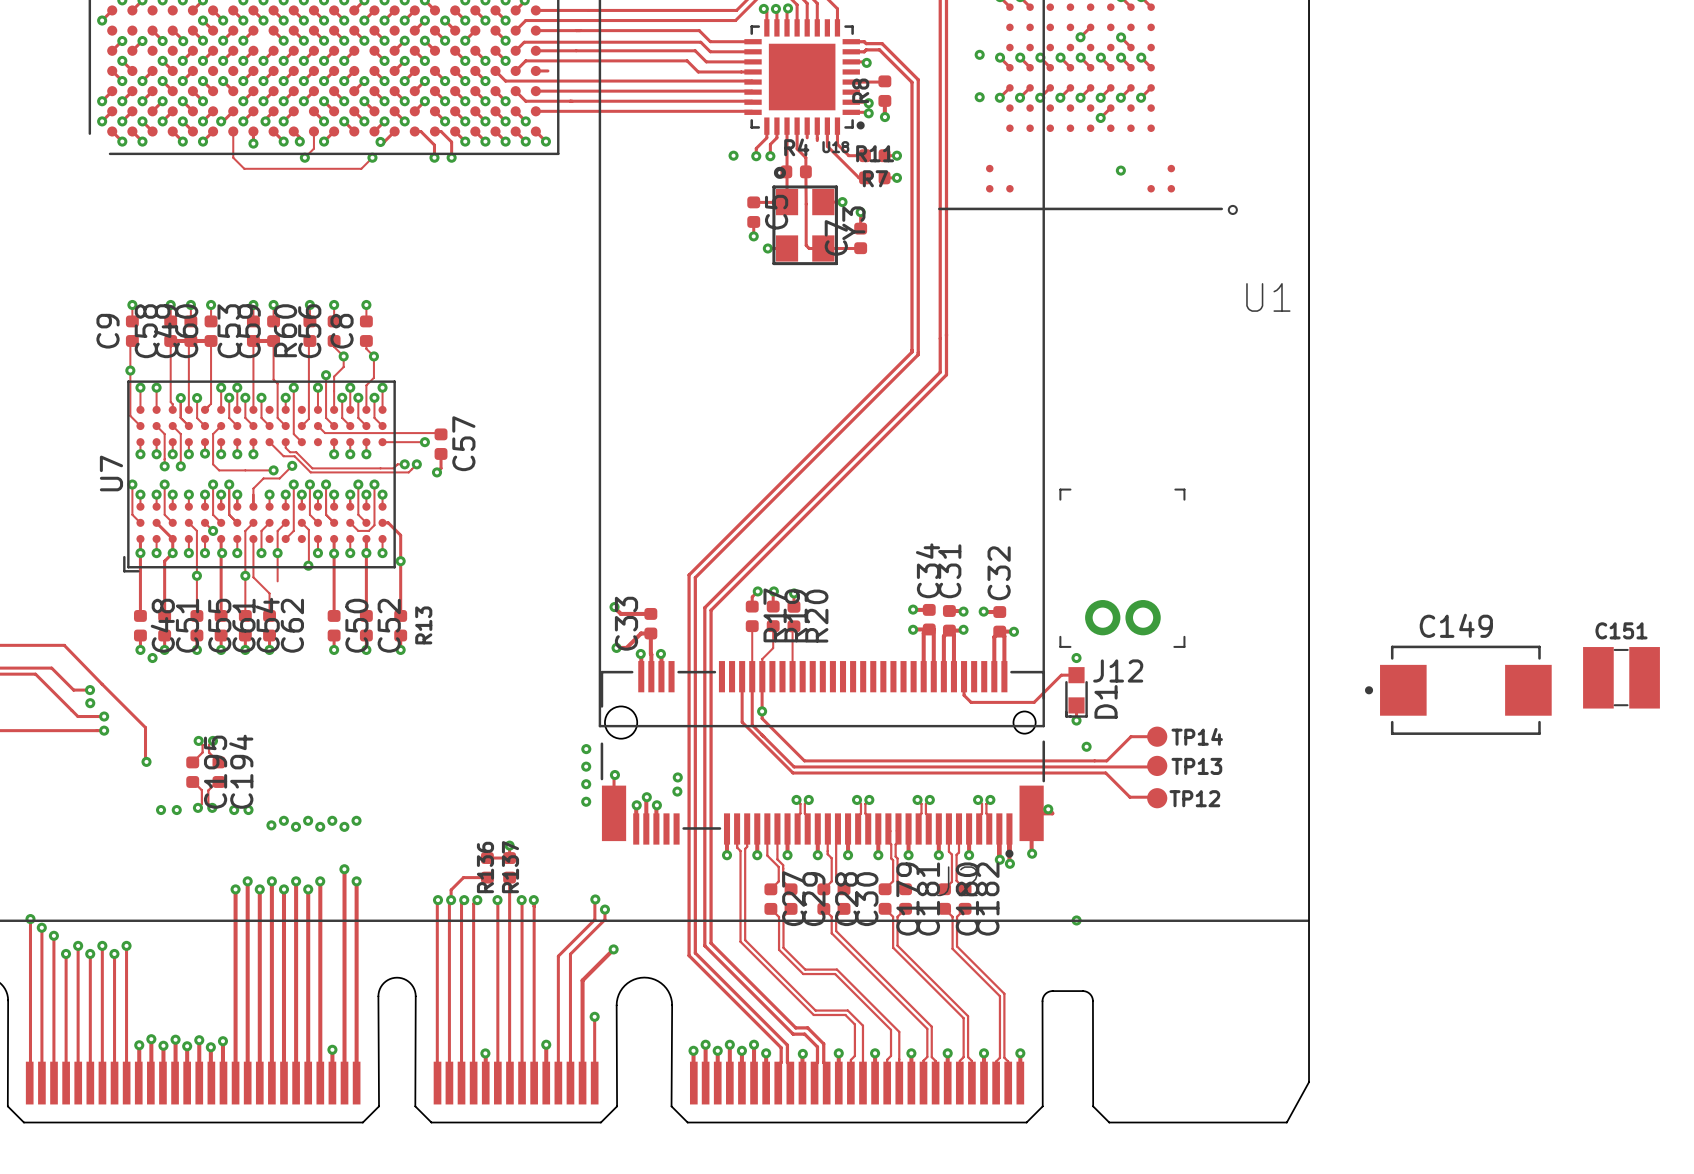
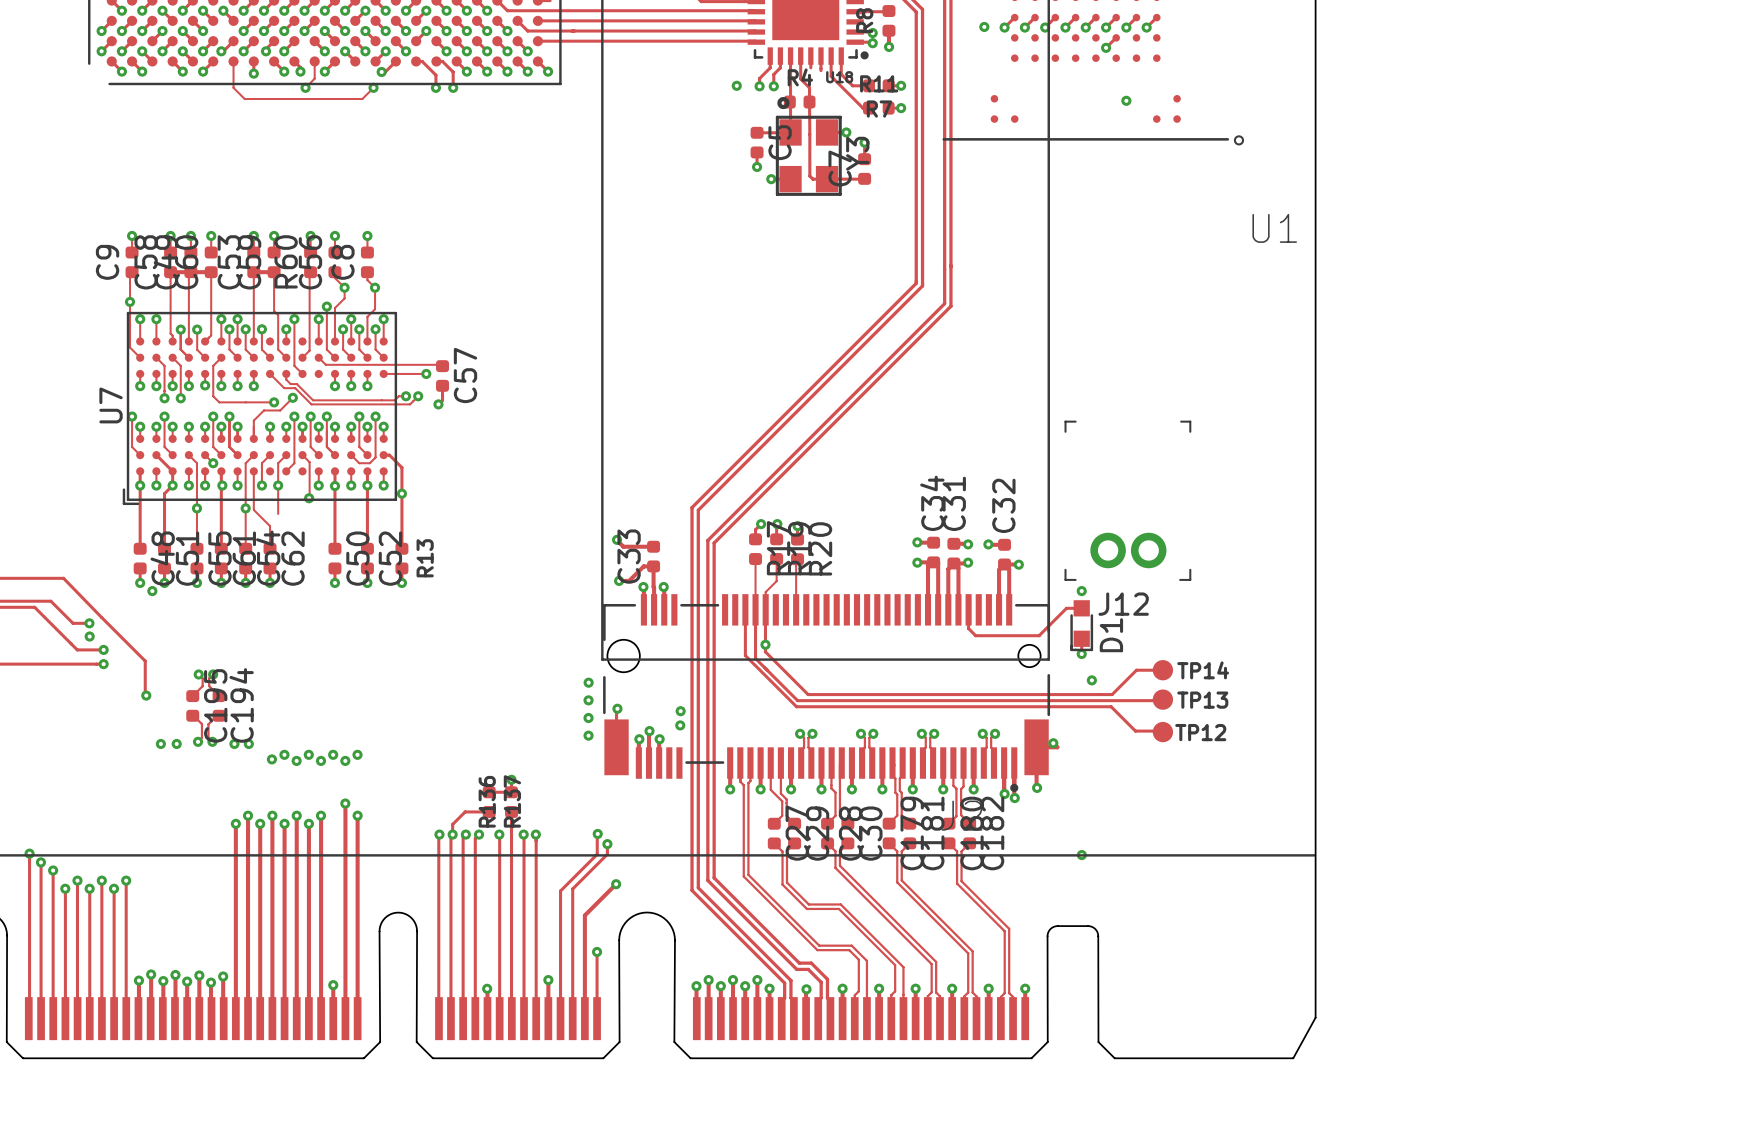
C151: (1621, 677) -> none
C149: (1458, 690) -> none

